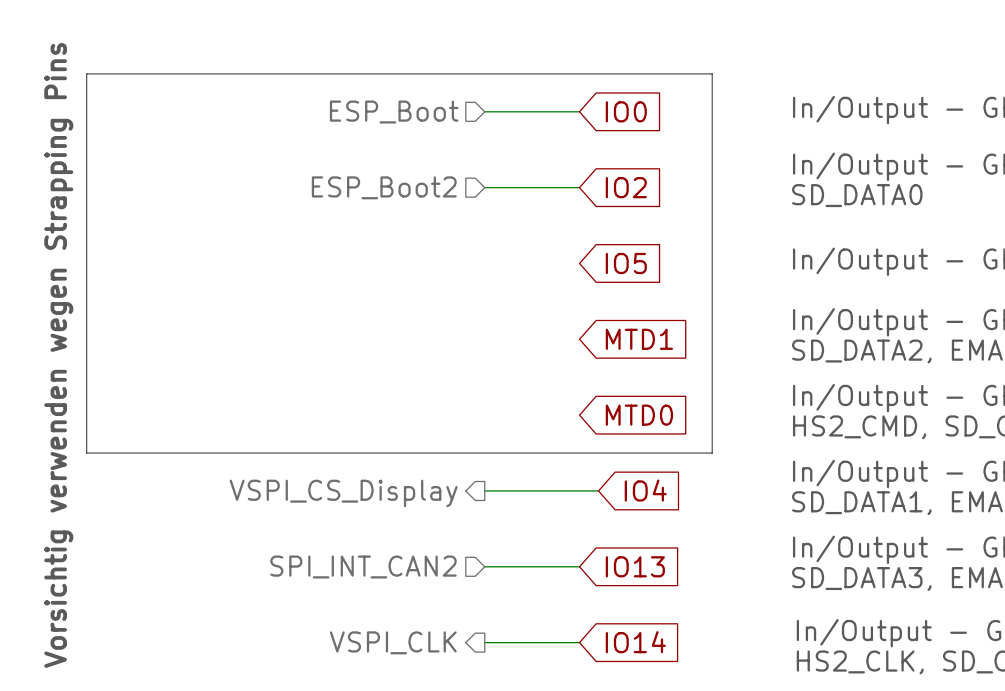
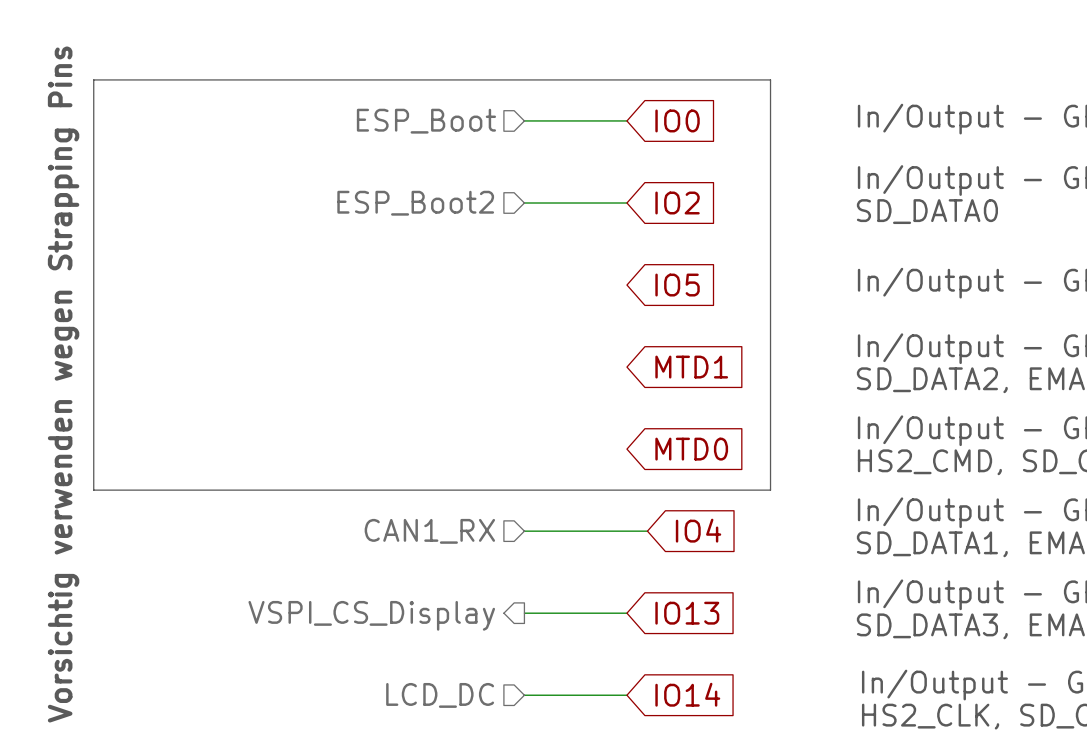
hierarchical label shape: output (343, 493) -> input (429, 531)
hierarchical label: VSPI_CS_Display (343, 493) -> CAN1_RX (429, 531)
hierarchical label shape: input (363, 567) -> output (371, 615)
hierarchical label: SPI_INT_CAN2 (363, 567) -> VSPI_CS_Display (371, 615)
hierarchical label shape: output (393, 642) -> input (440, 695)
hierarchical label: VSPI_CLK (393, 642) -> LCD_DC (440, 695)

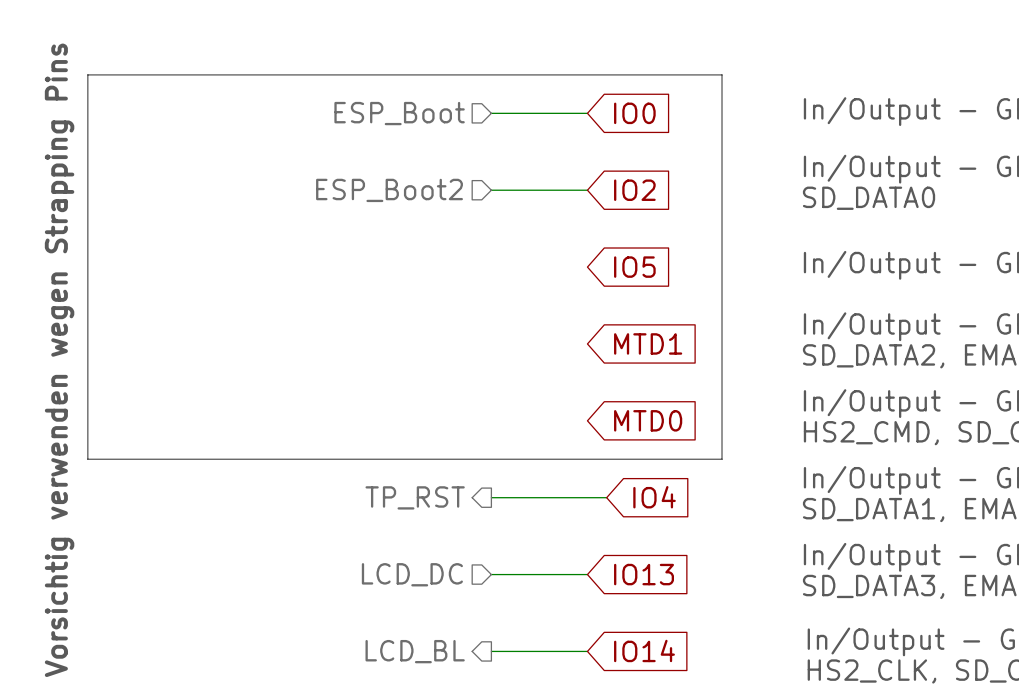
hierarchical label shape: input (429, 531) -> output (415, 497)
hierarchical label: CAN1_RX (429, 531) -> TP_RST (415, 497)
hierarchical label shape: output (371, 615) -> input (412, 574)
hierarchical label: VSPI_CS_Display (371, 615) -> LCD_DC (412, 574)
hierarchical label shape: input (440, 695) -> output (415, 651)
hierarchical label: LCD_DC (440, 695) -> LCD_BL (415, 651)

